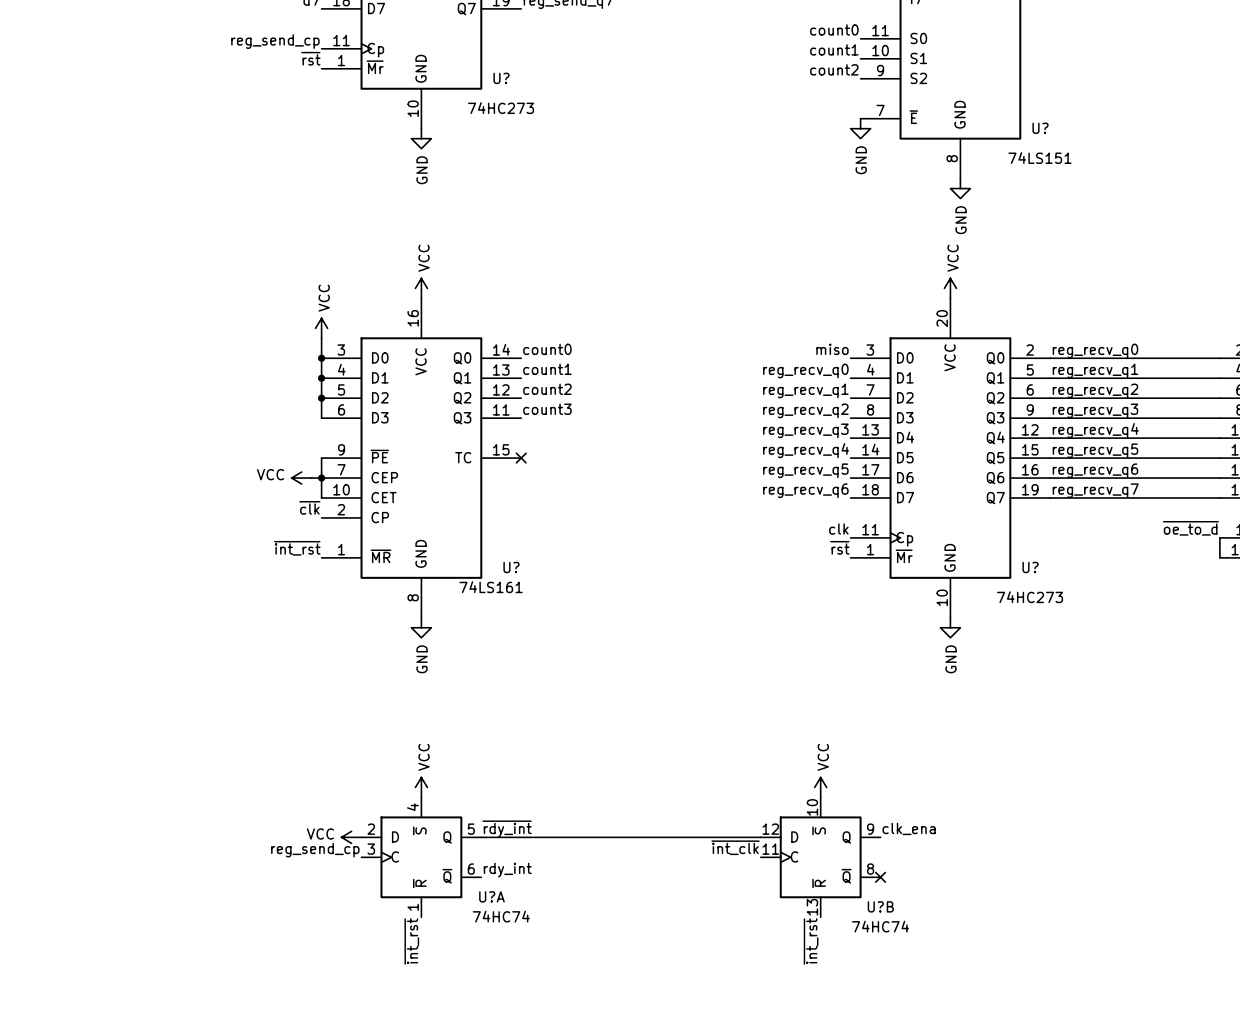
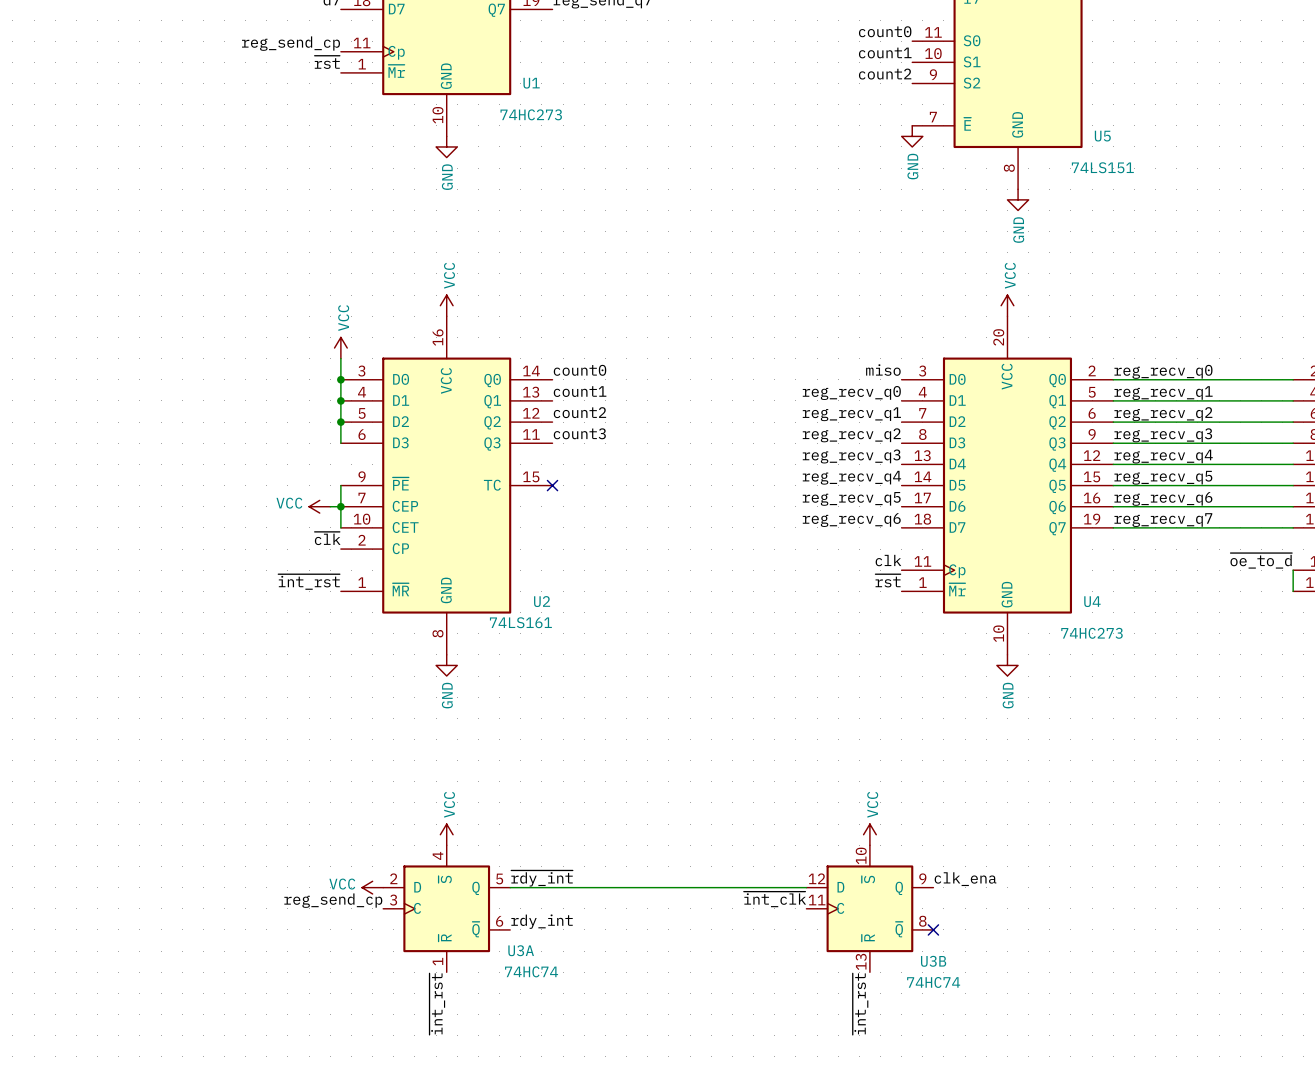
U? name: U? (501, 78) -> U1 (531, 83)
U? name: U? (1040, 128) -> U5 (1102, 136)
U? name: U? (511, 567) -> U2 (542, 601)
U? name: U? (1030, 567) -> U4 (1092, 601)
U?A name: U?A (491, 896) -> U3A (521, 950)
U?B name: U?B (880, 906) -> U3B (933, 961)

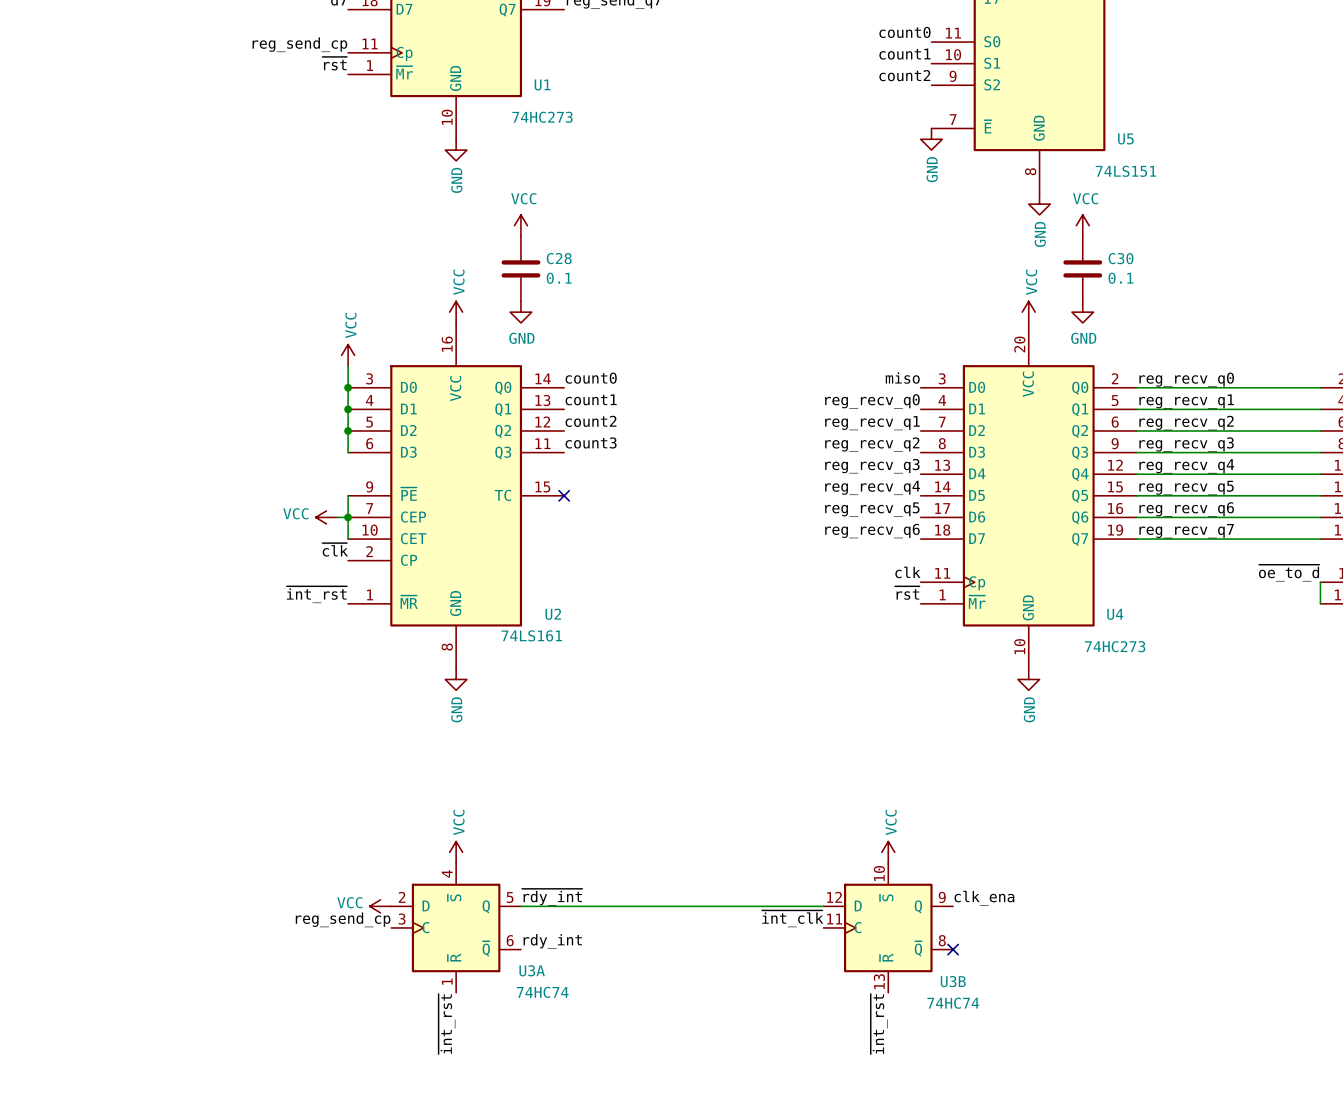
power symbol: none -> VCC (520, 225)
power symbol: none -> VCC (1082, 225)
C28: none -> 0.1 (520, 268)
C30: none -> 0.1 (1082, 268)
power symbol: none -> GND (520, 312)
power symbol: none -> GND (1082, 312)

